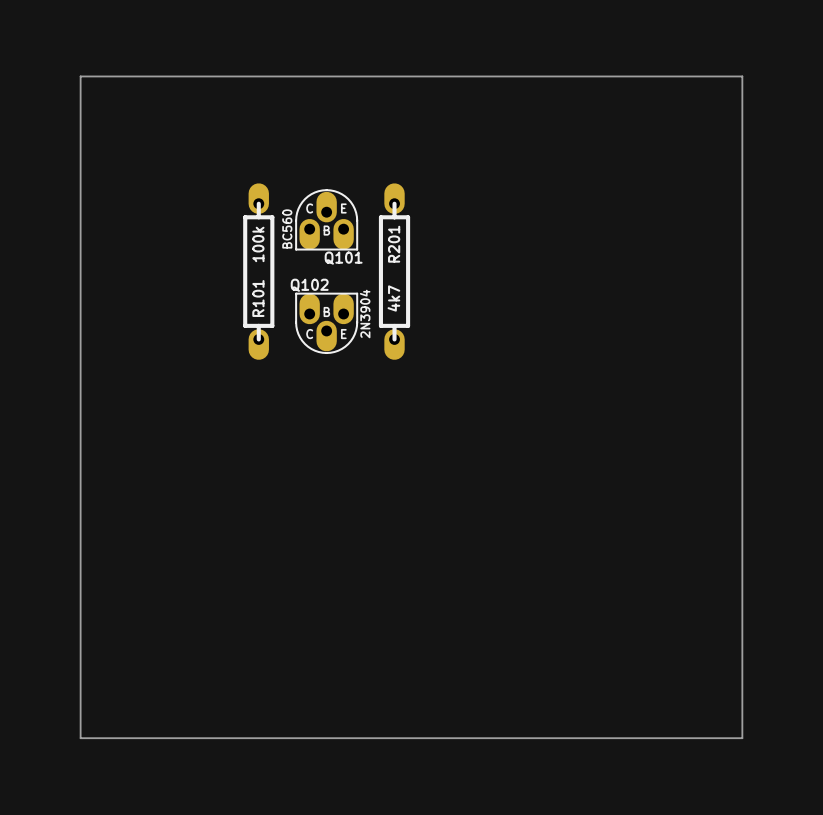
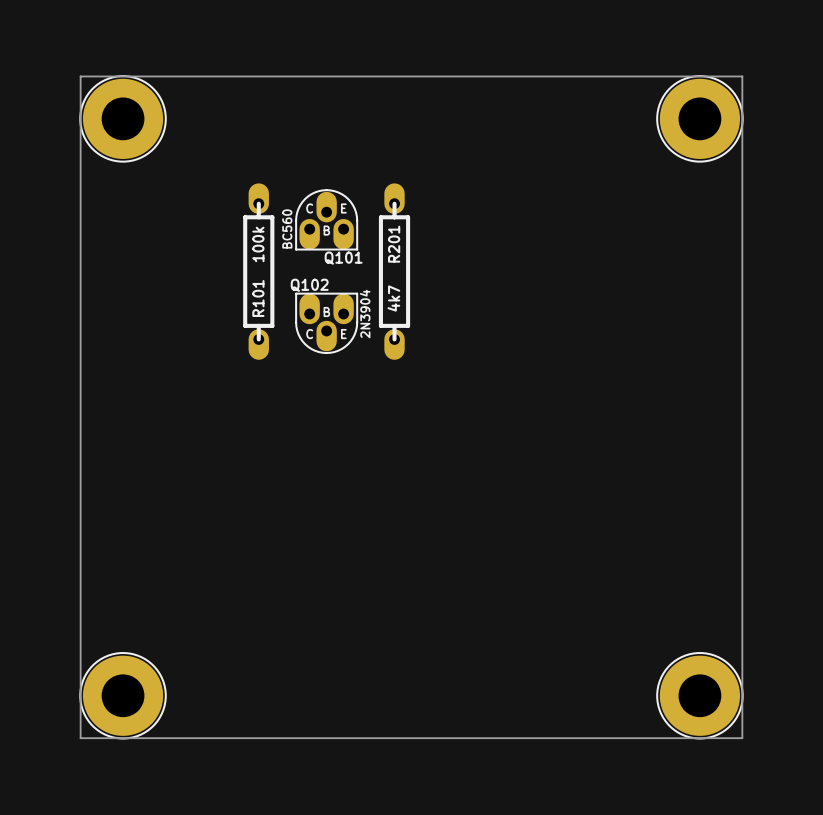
part: none -> (123, 118)
part: none -> (699, 118)
part: none -> (123, 695)
part: none -> (699, 695)

